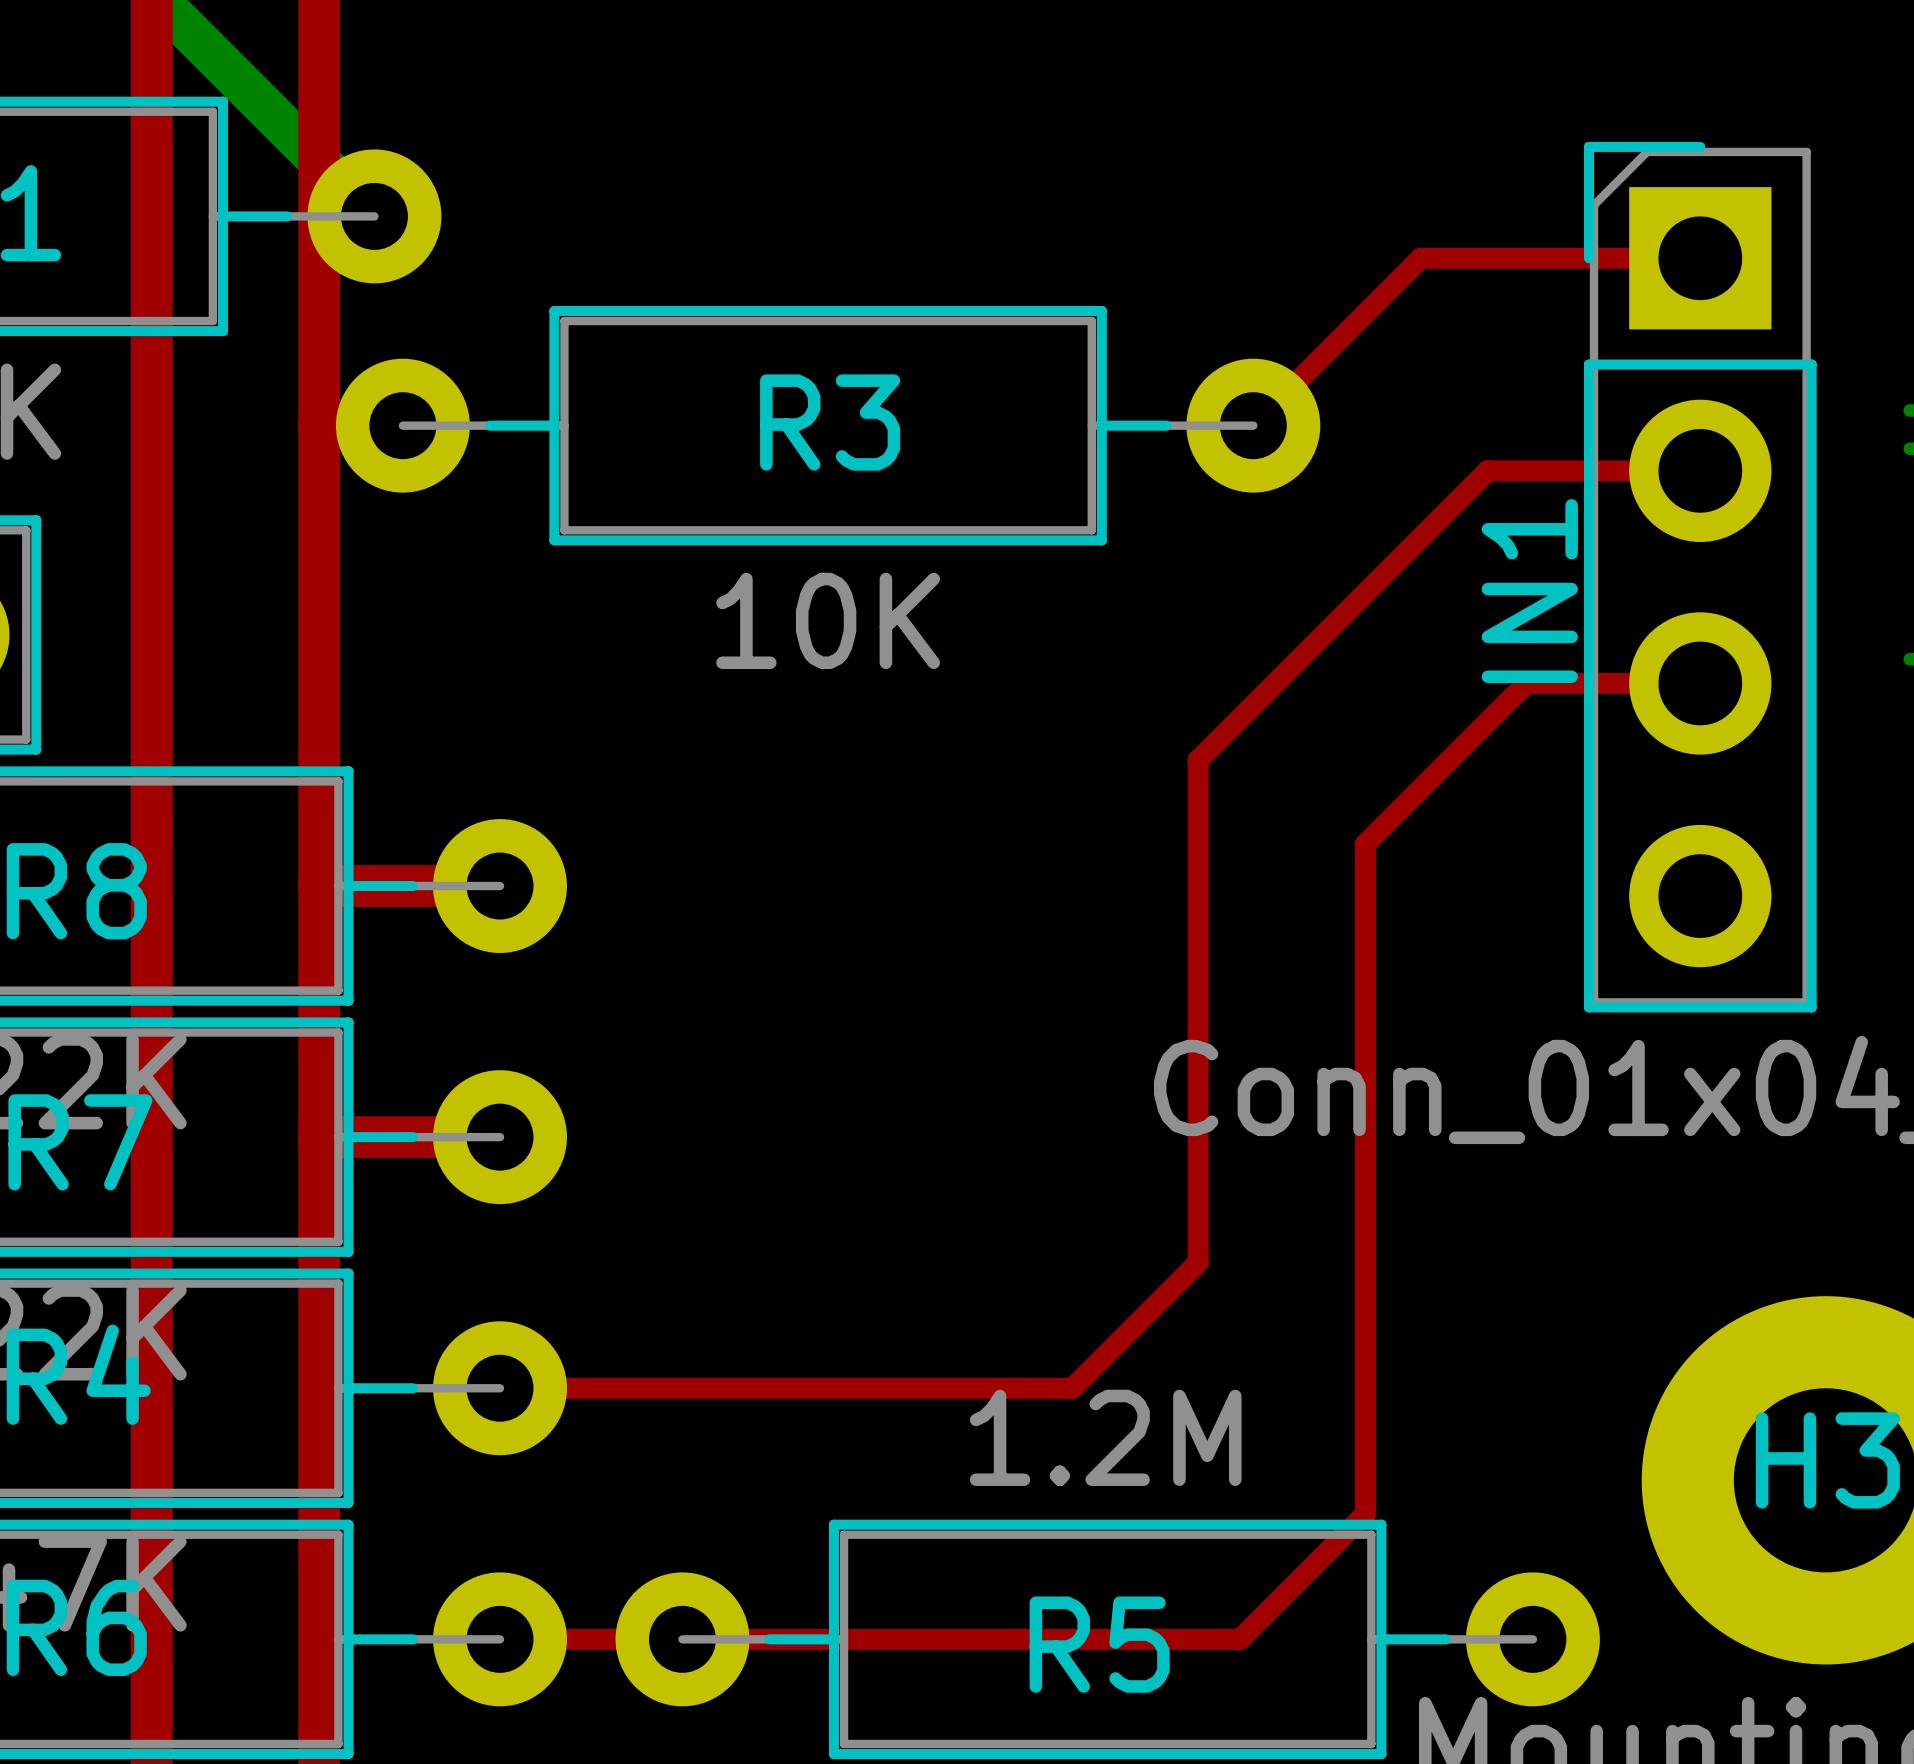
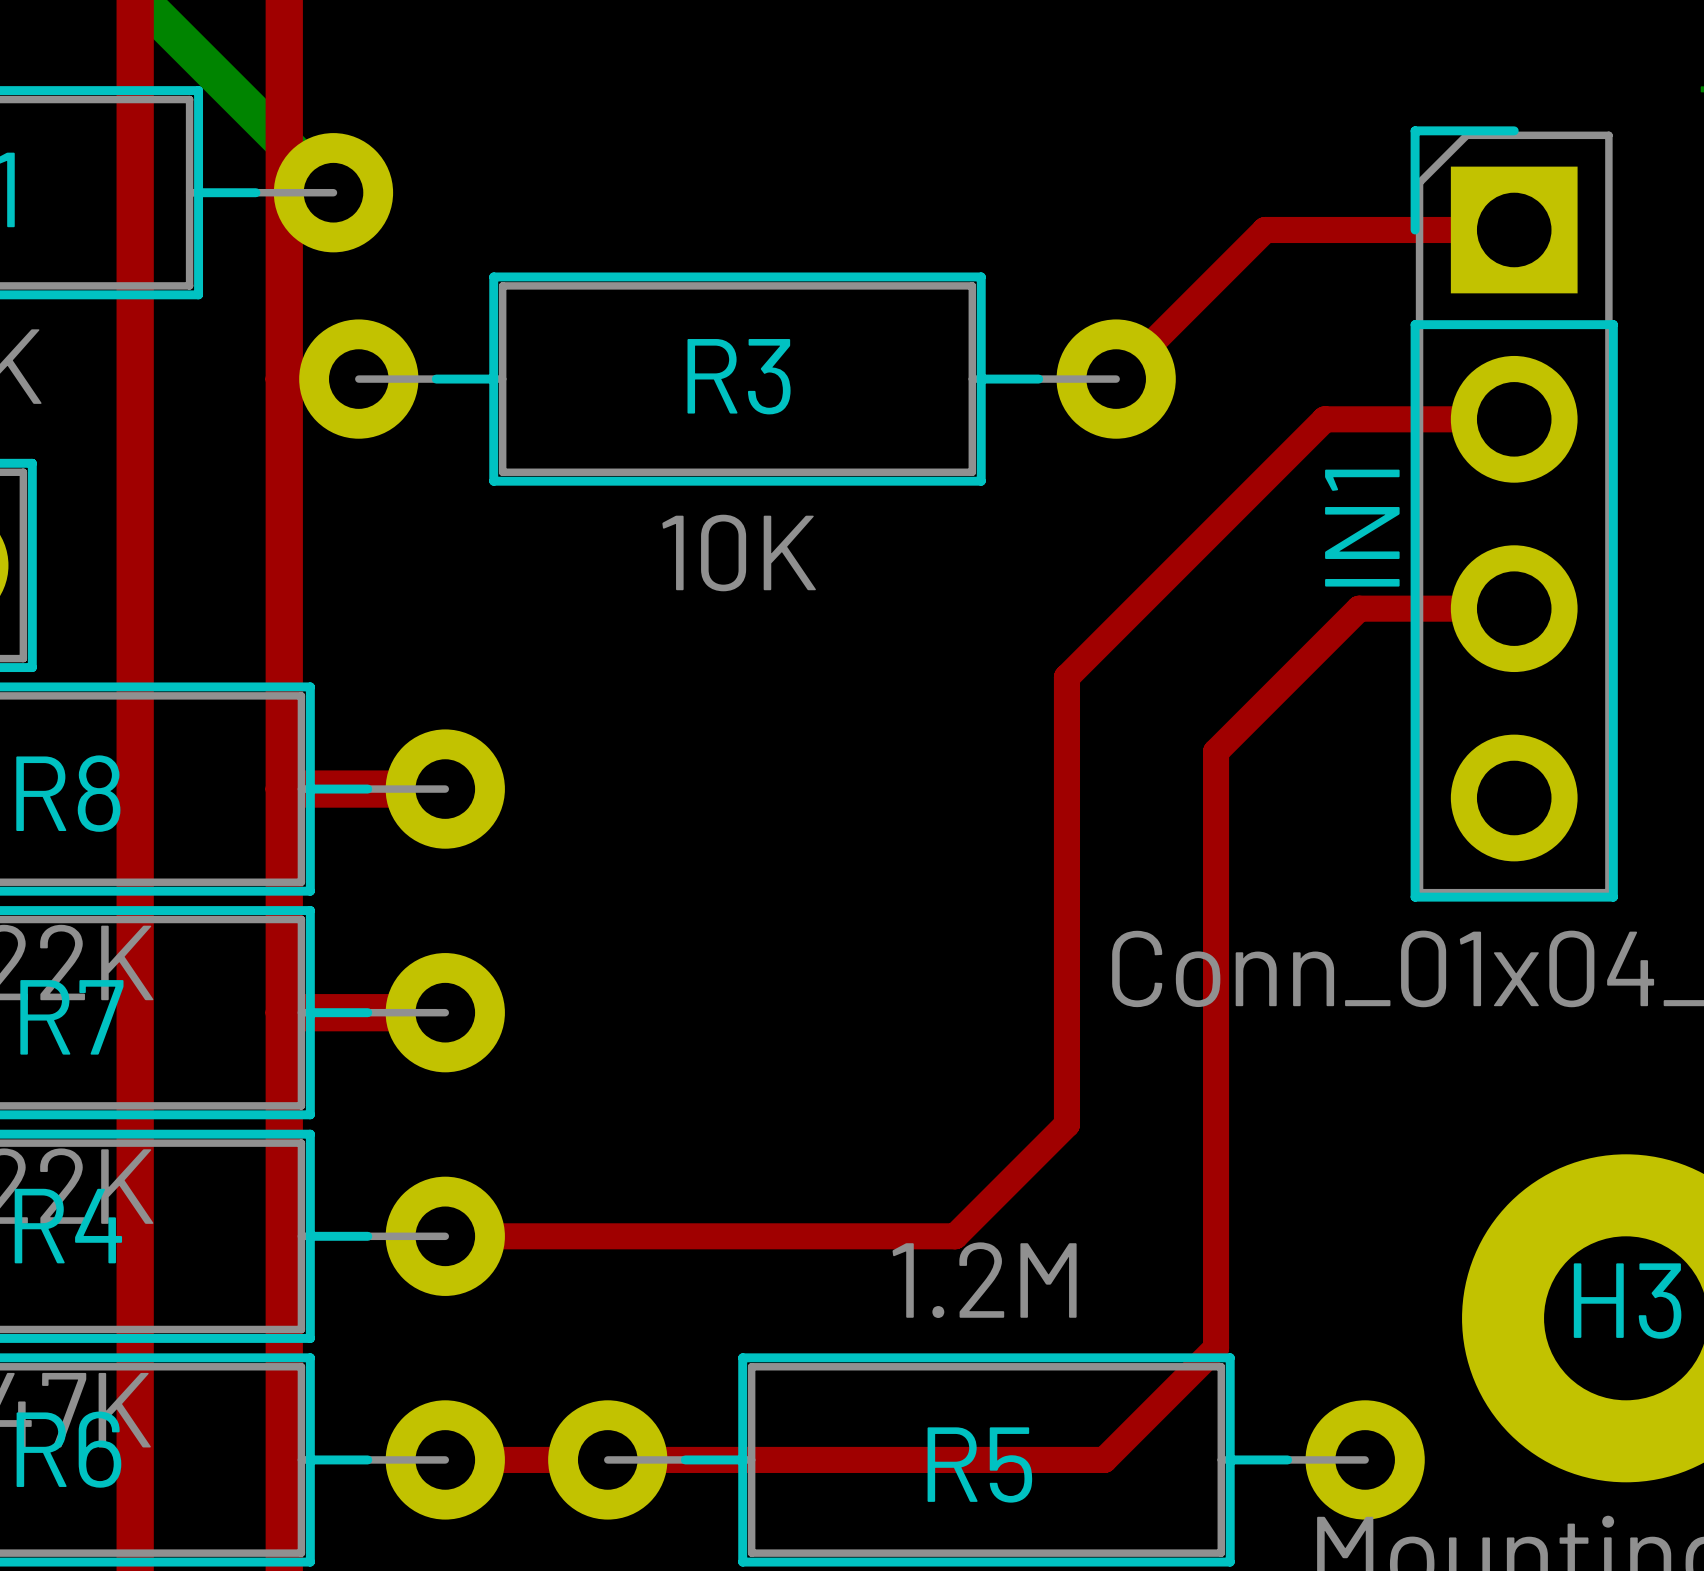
top track width: thin (1700, 258) (1420, 258) (1253, 425) -> thick (1514, 229) (1265, 229) (1116, 379)
top track width: thin (1700, 470) (1487, 470) (1198, 760) (1198, 1262) (1072, 1388) (500, 1388) -> thick (1514, 419) (1324, 419) (1066, 677) (1066, 1124) (955, 1236) (445, 1236)
top track width: thin (1700, 683) (1526, 683) (1365, 844) (1365, 1513) (1239, 1639) (500, 1639) -> thick (1514, 608) (1359, 608) (1216, 751) (1216, 1348) (1104, 1459) (445, 1459)

